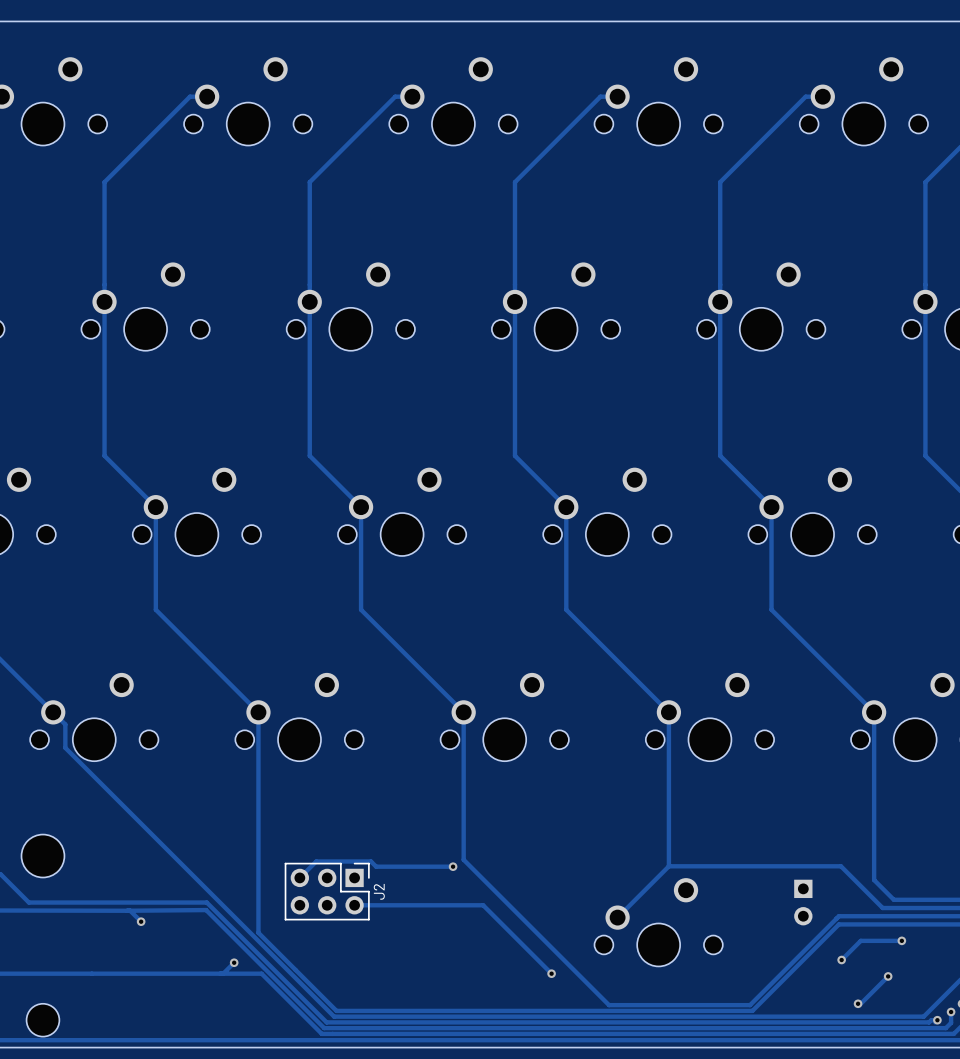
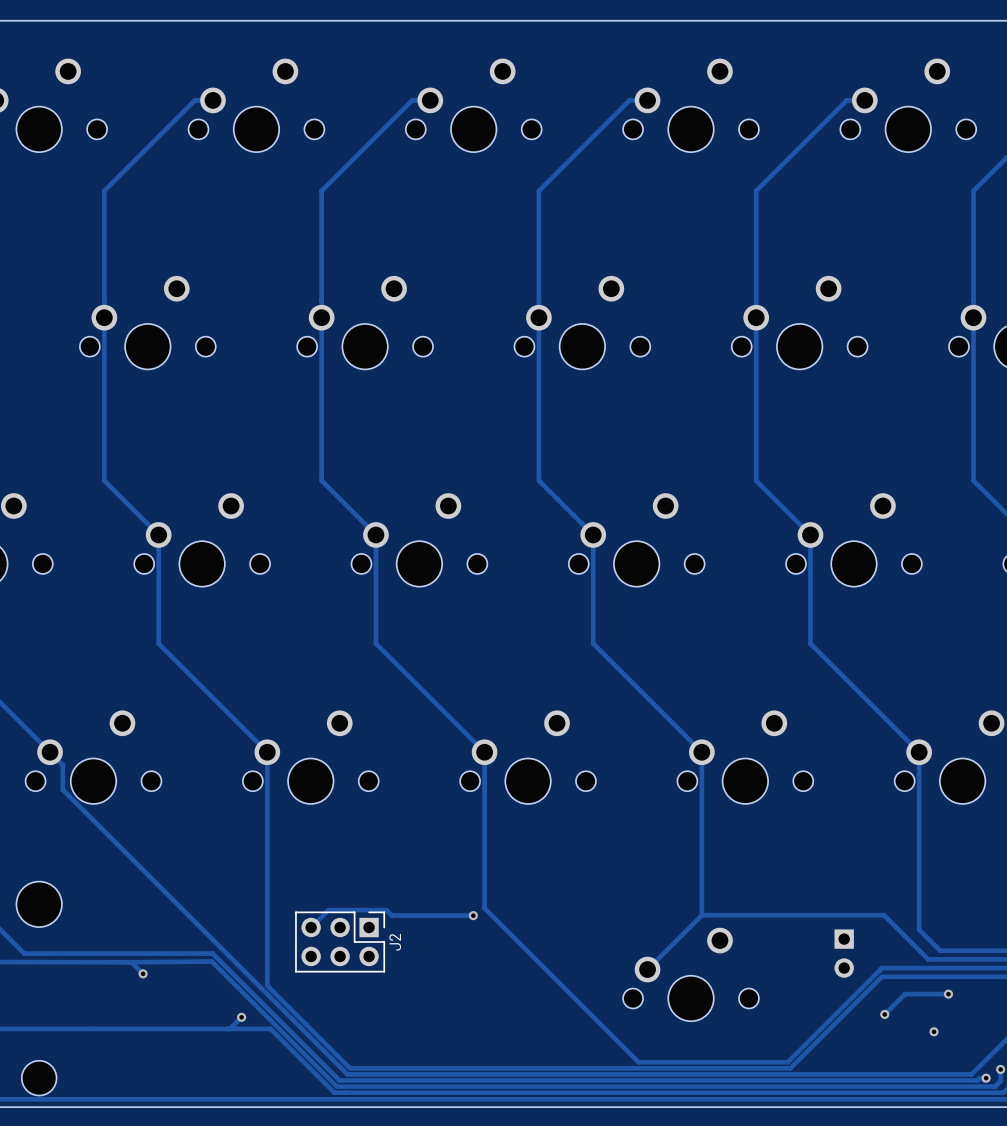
track: (354, 905) (483, 905) (551, 973) -> none
via: (551, 973) -> none
track: (888, 976) (860, 1003) (858, 1003) -> none
via: (858, 1003) -> none

